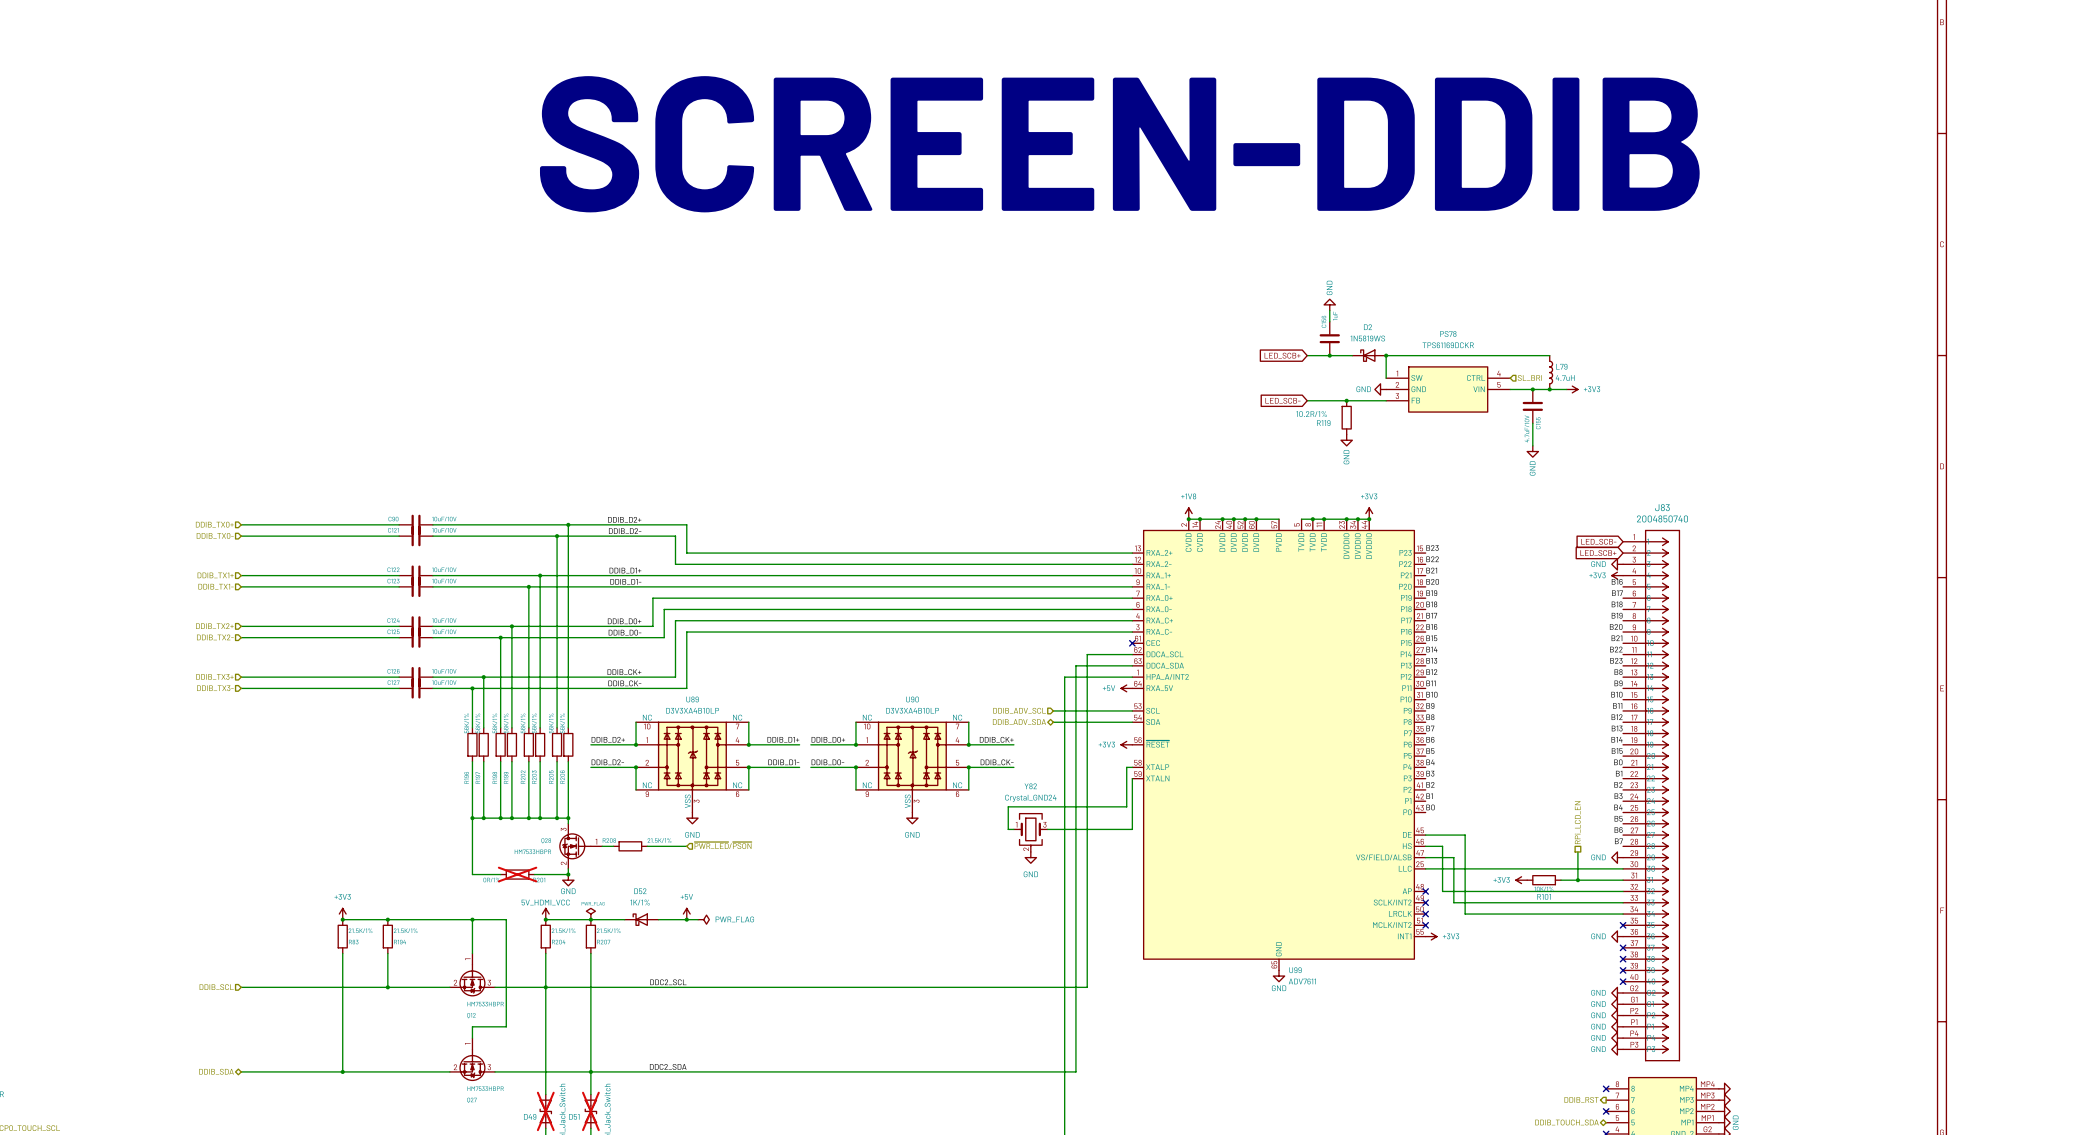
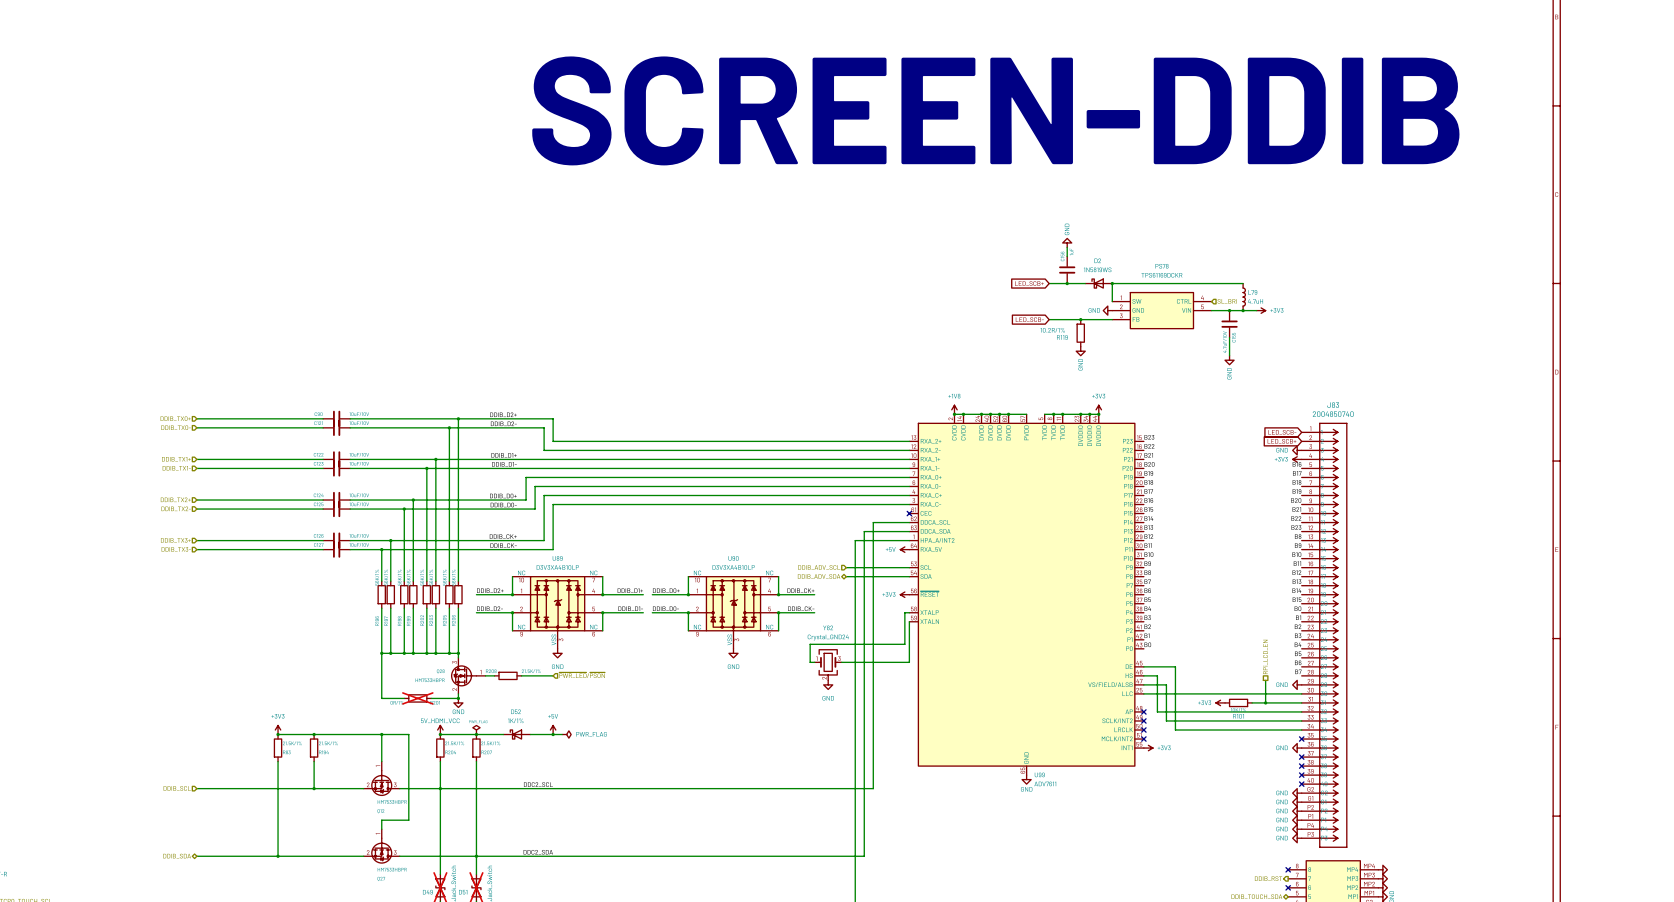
text: none -> SCREEN-DDIB (995, 110)
text: SCREEN-DDIB (1119, 144) -> none

